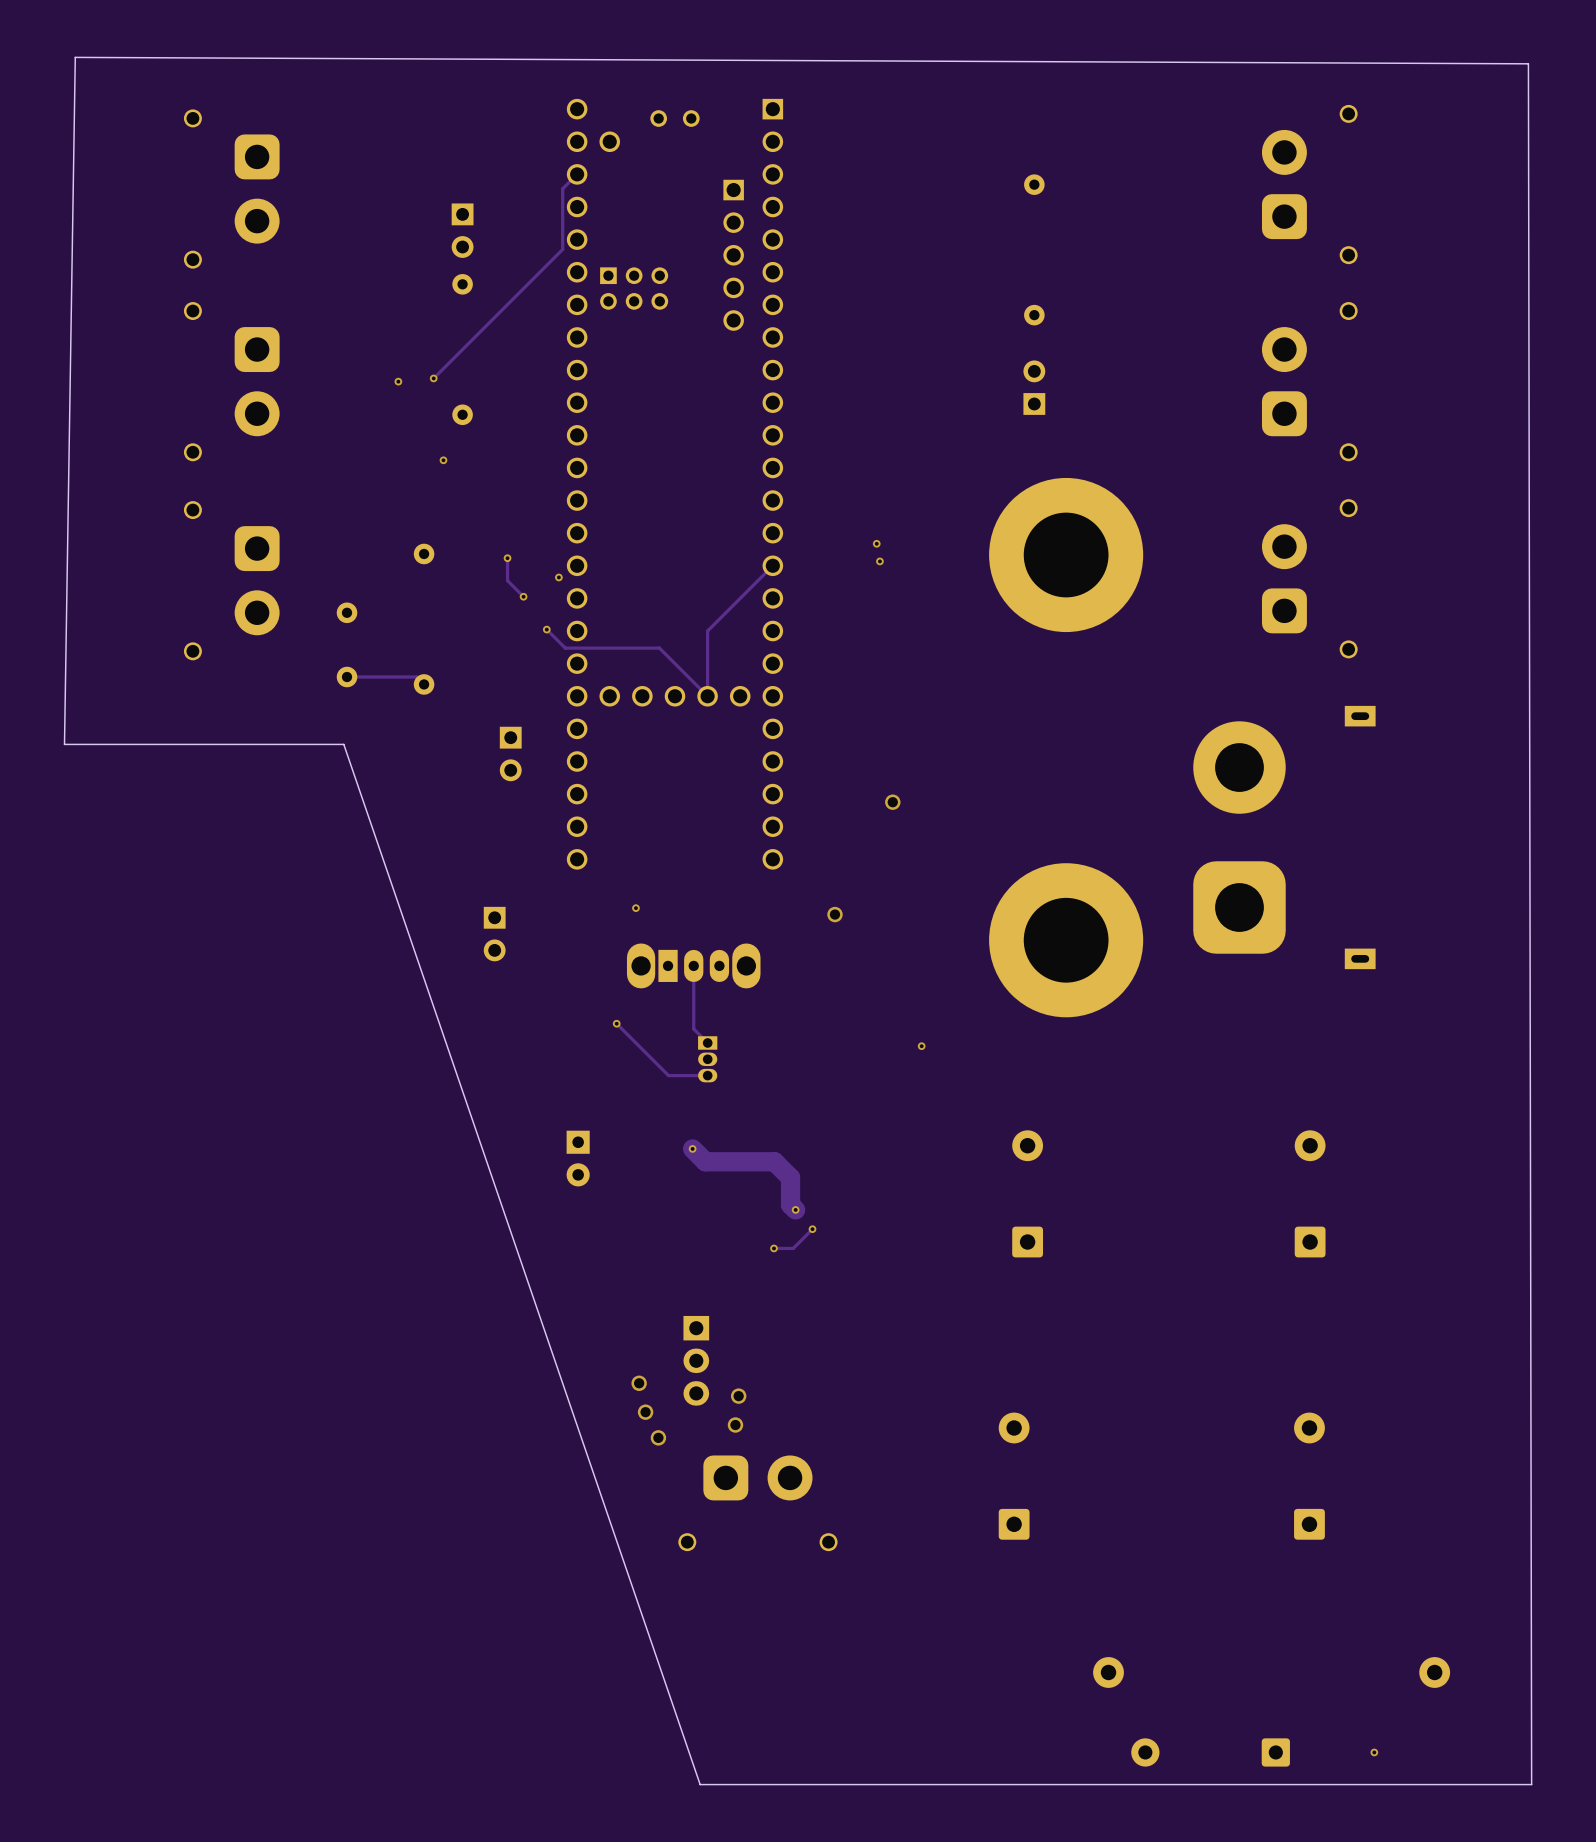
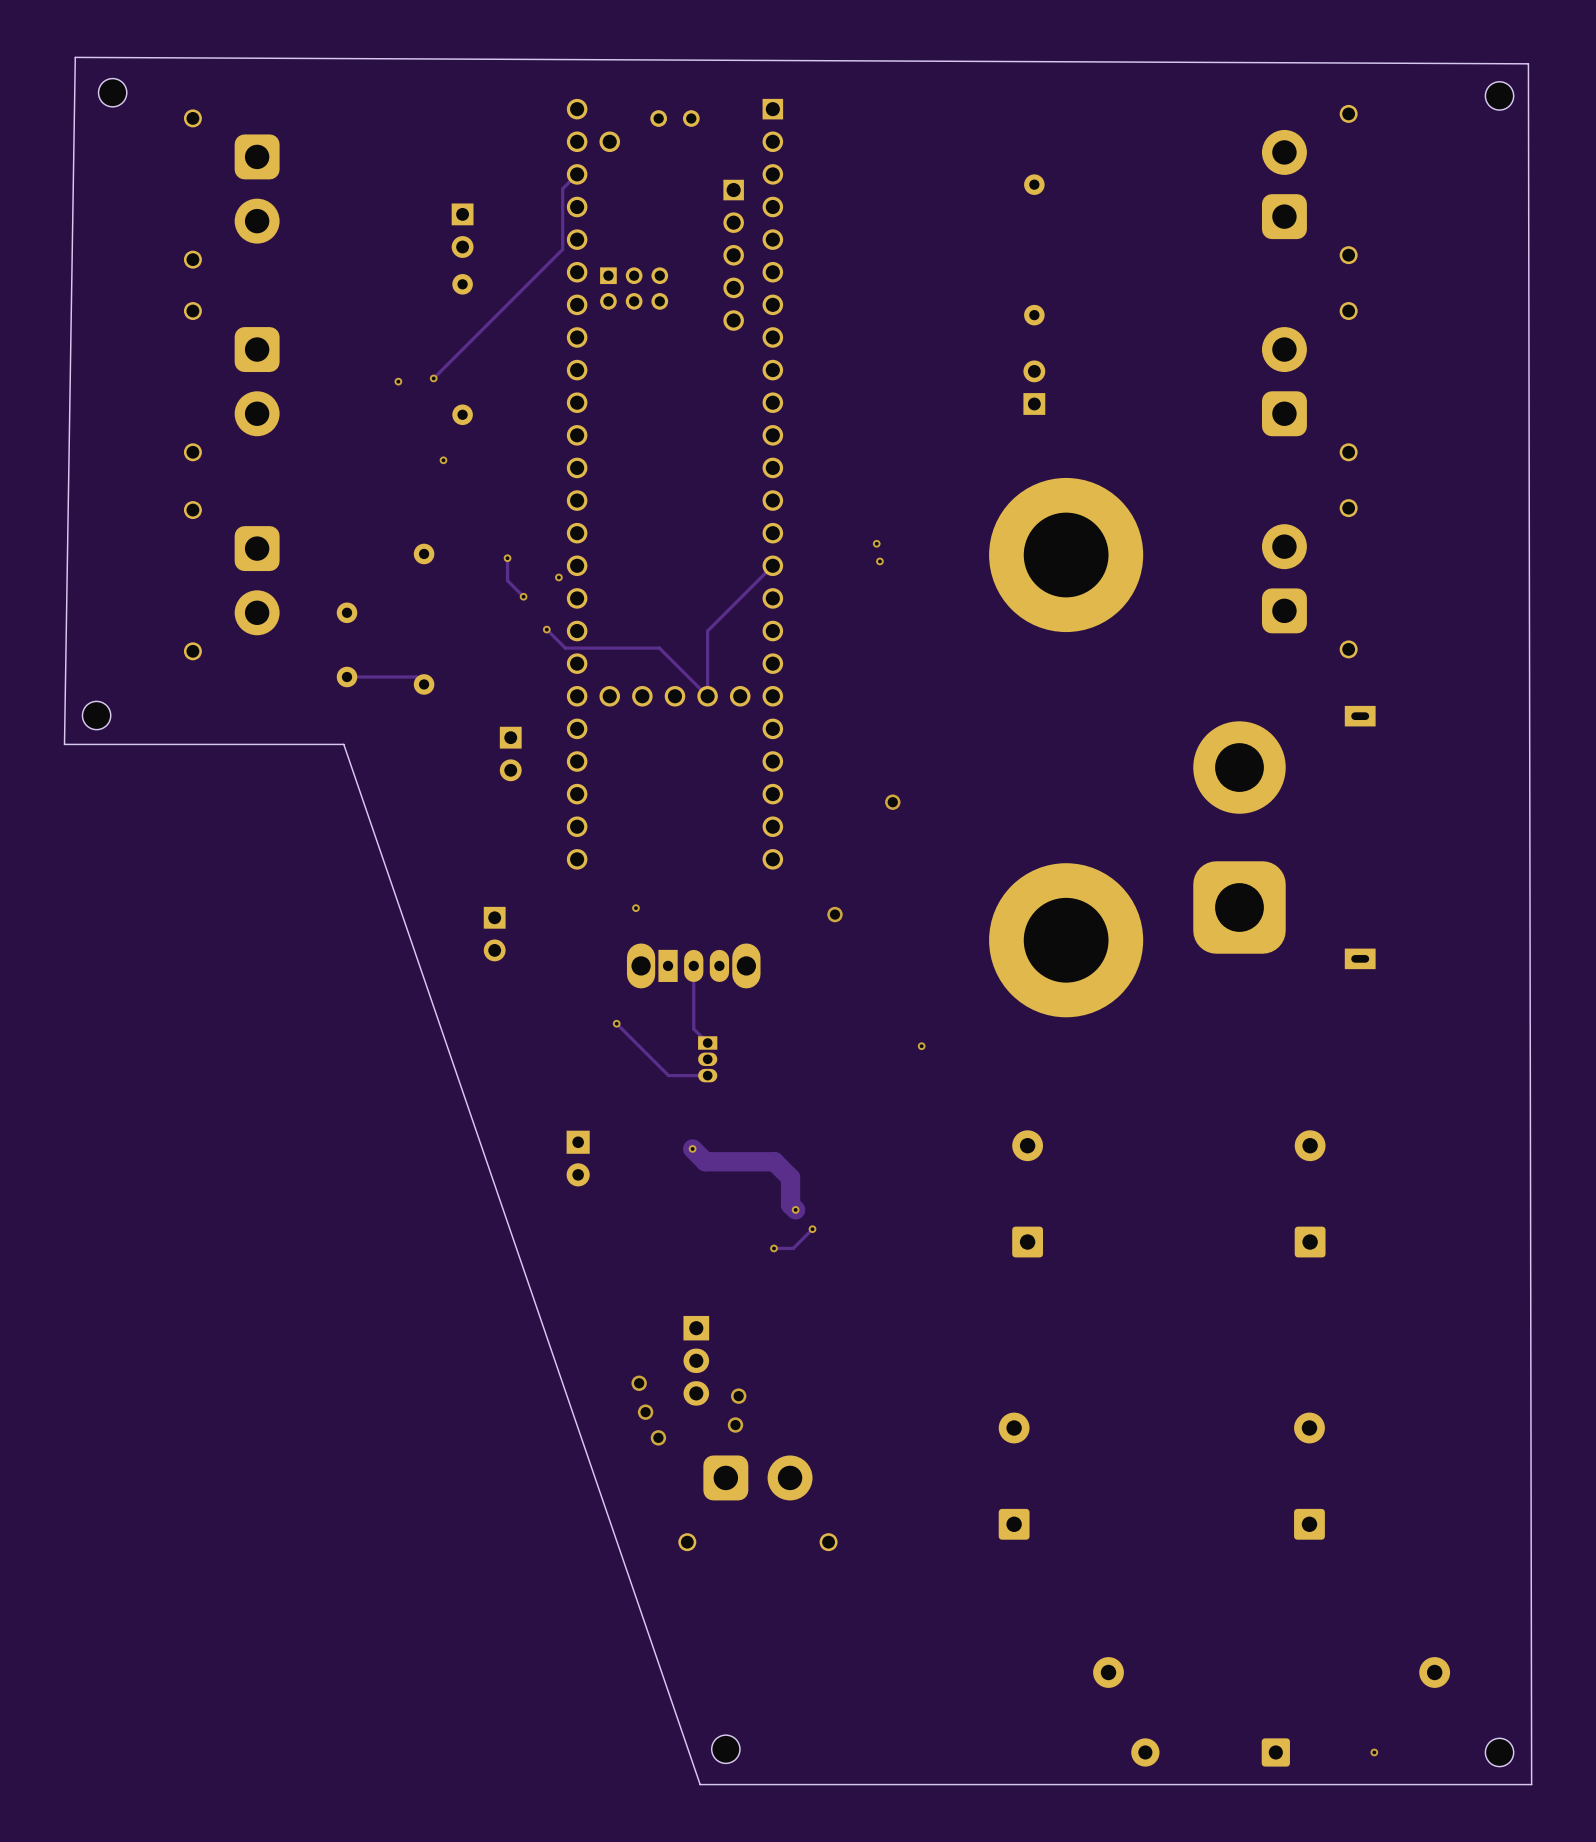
part: none -> (112, 92)
part: none -> (1499, 95)
part: none -> (96, 715)
part: none -> (725, 1749)
part: none -> (1499, 1752)

